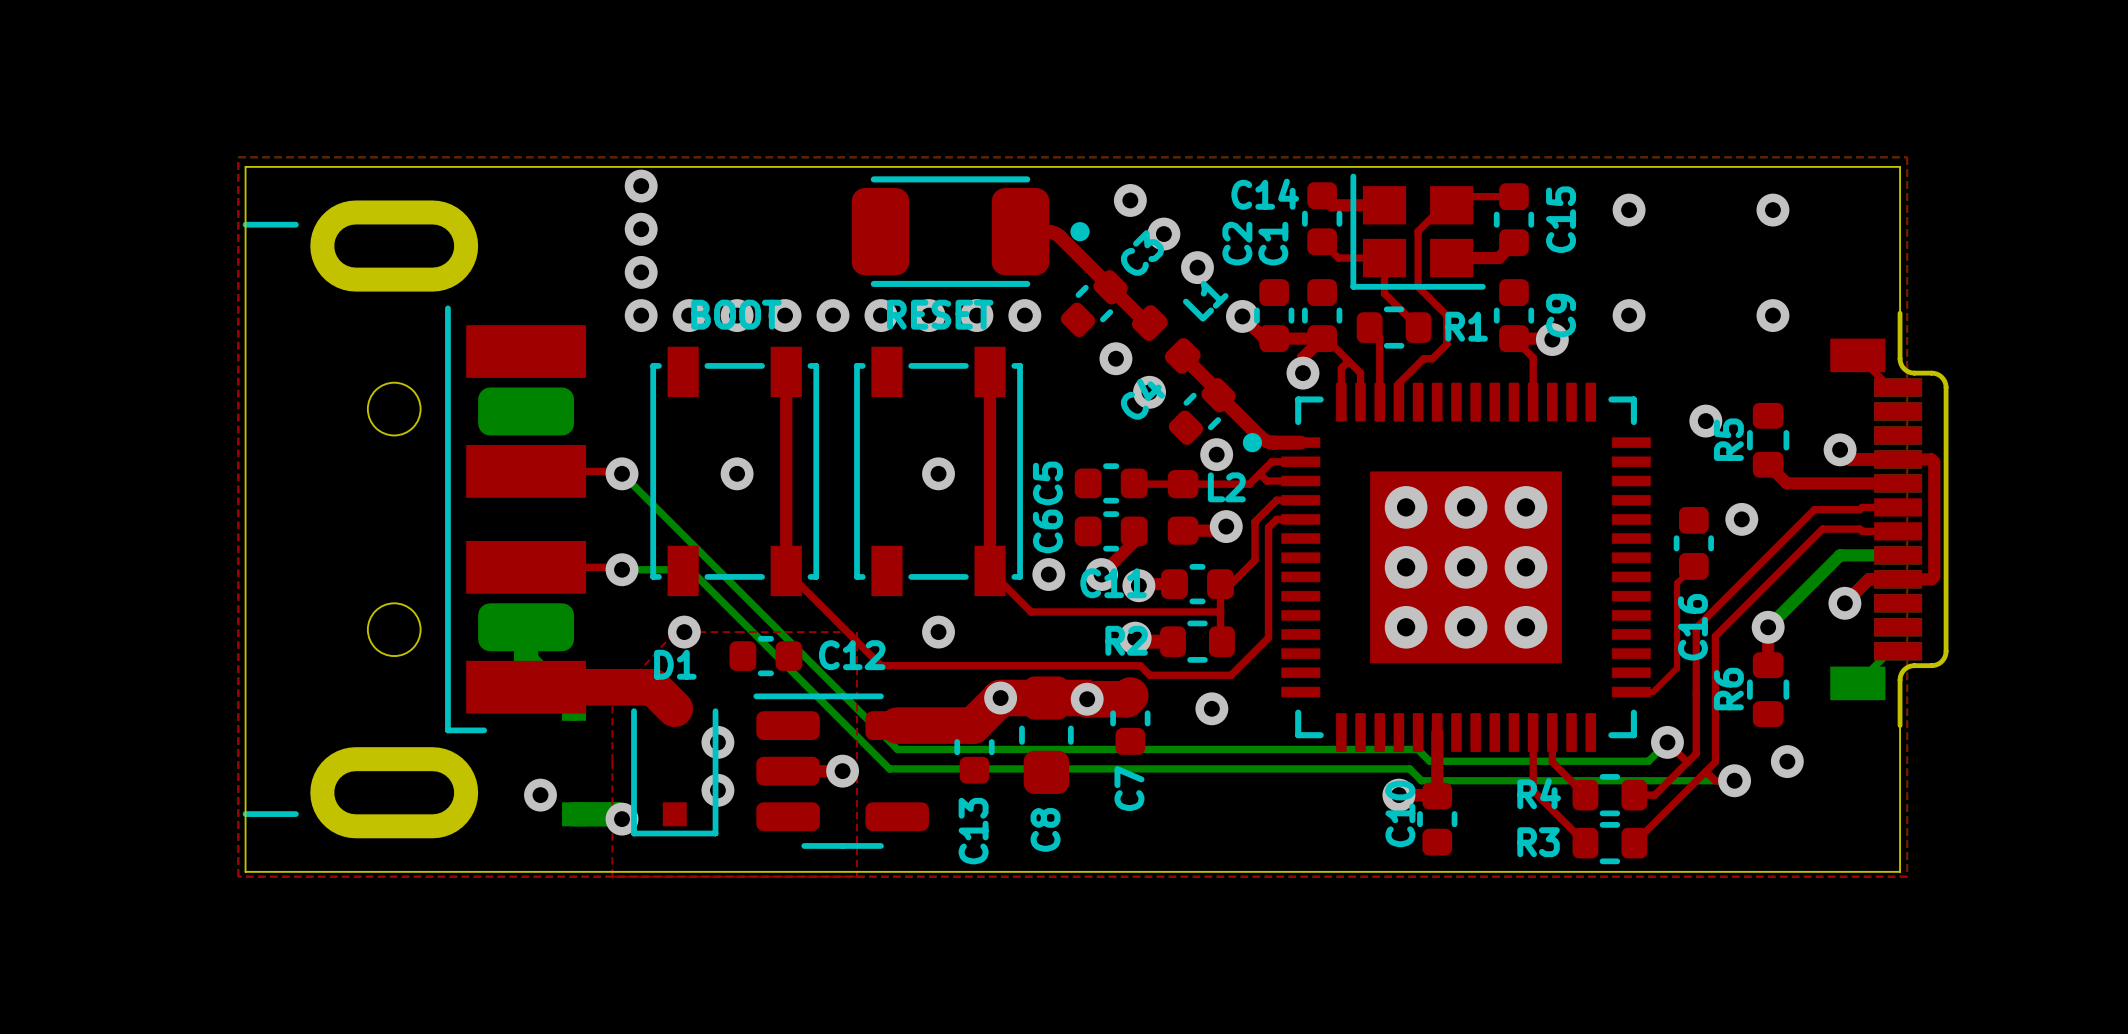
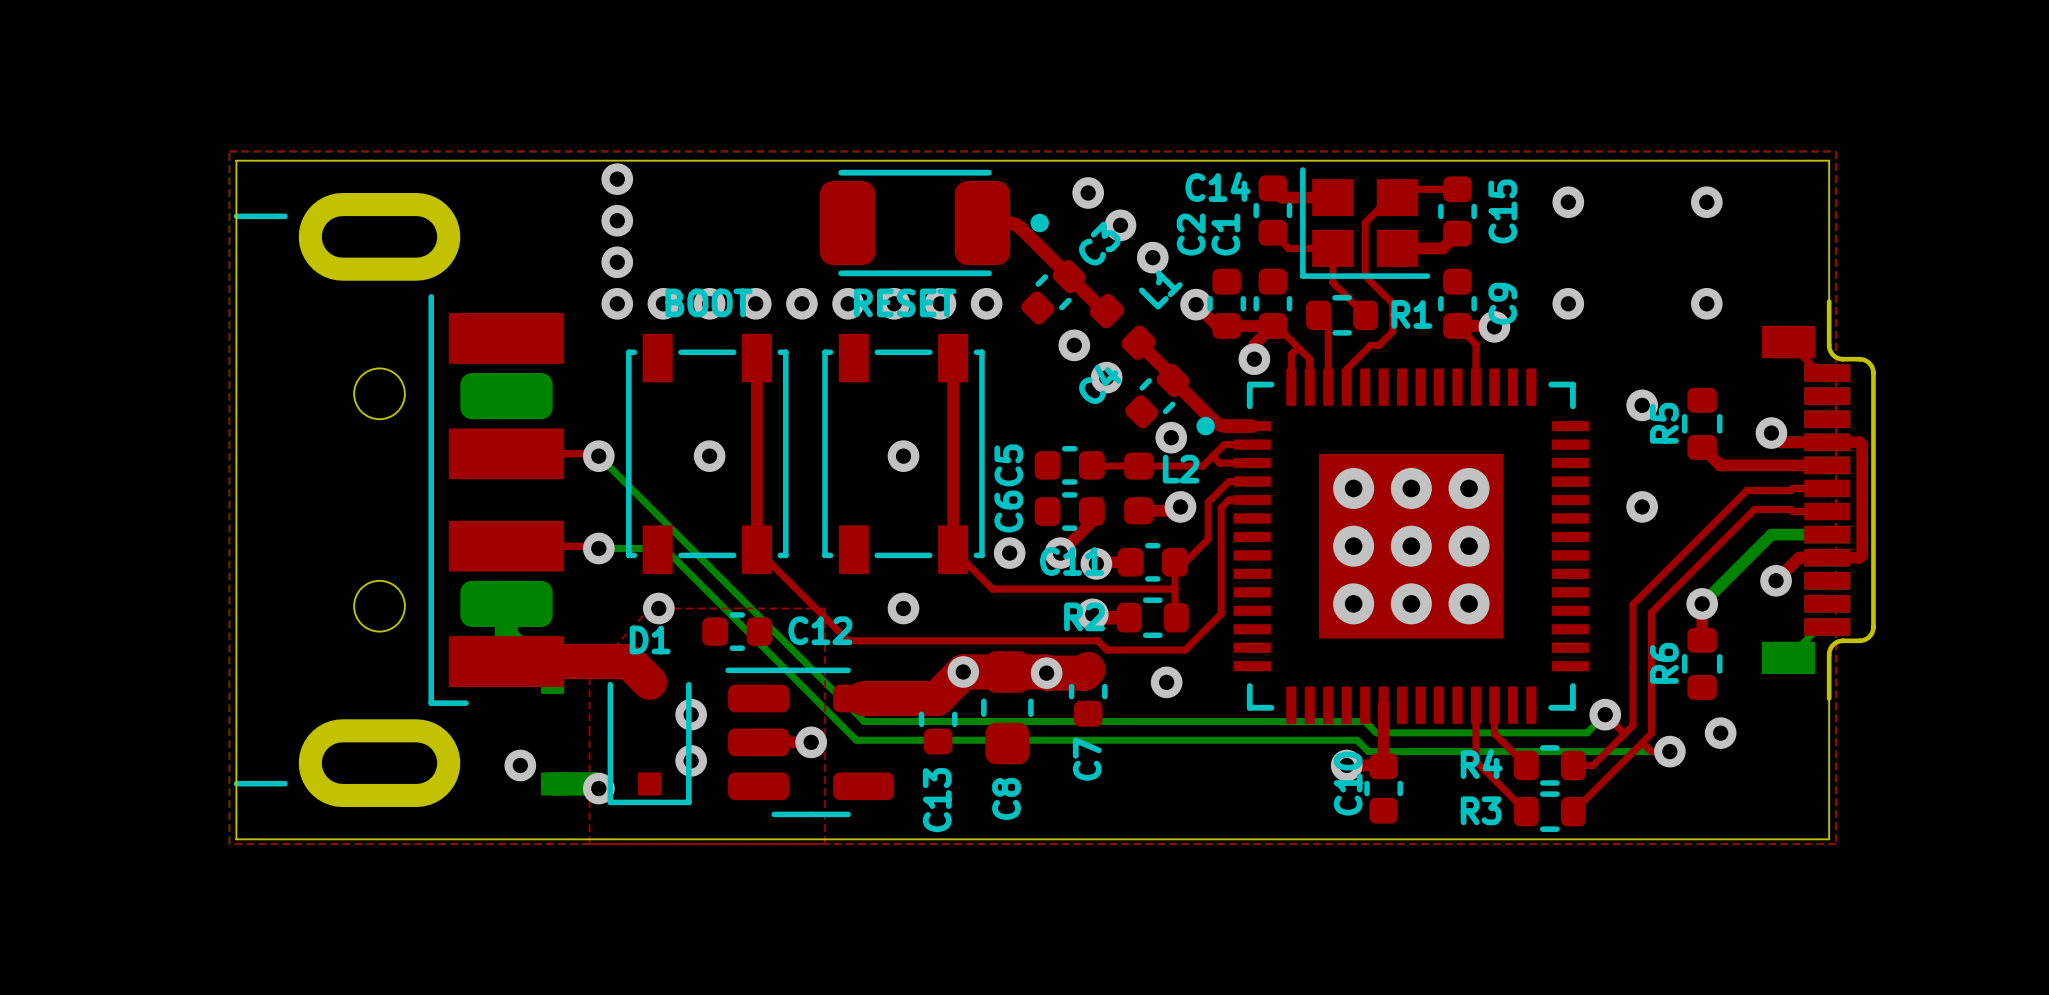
via position: (1741, 519) -> (1642, 506)
C16: (1693, 543) -> none
top track: (1693, 566) (1677, 583) (1677, 668) (1653, 692) (1631, 692) -> none

